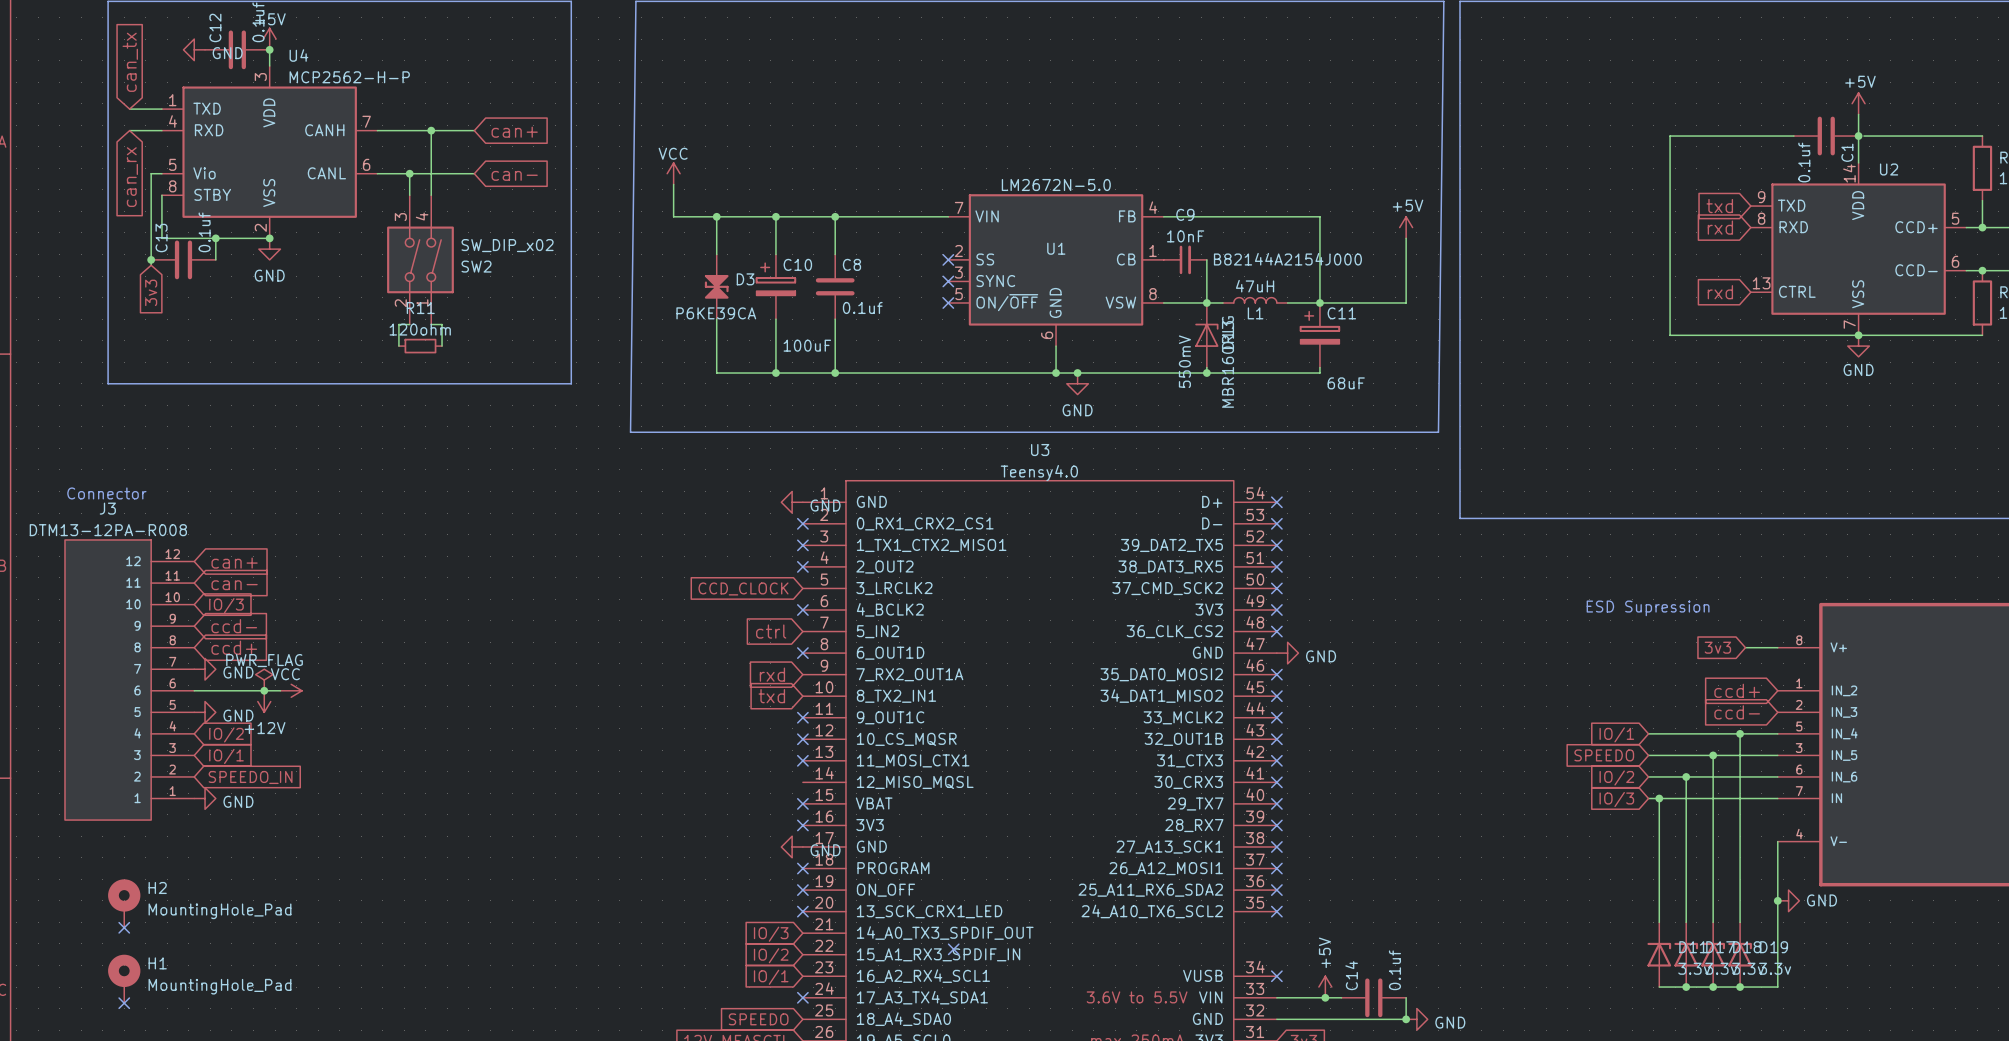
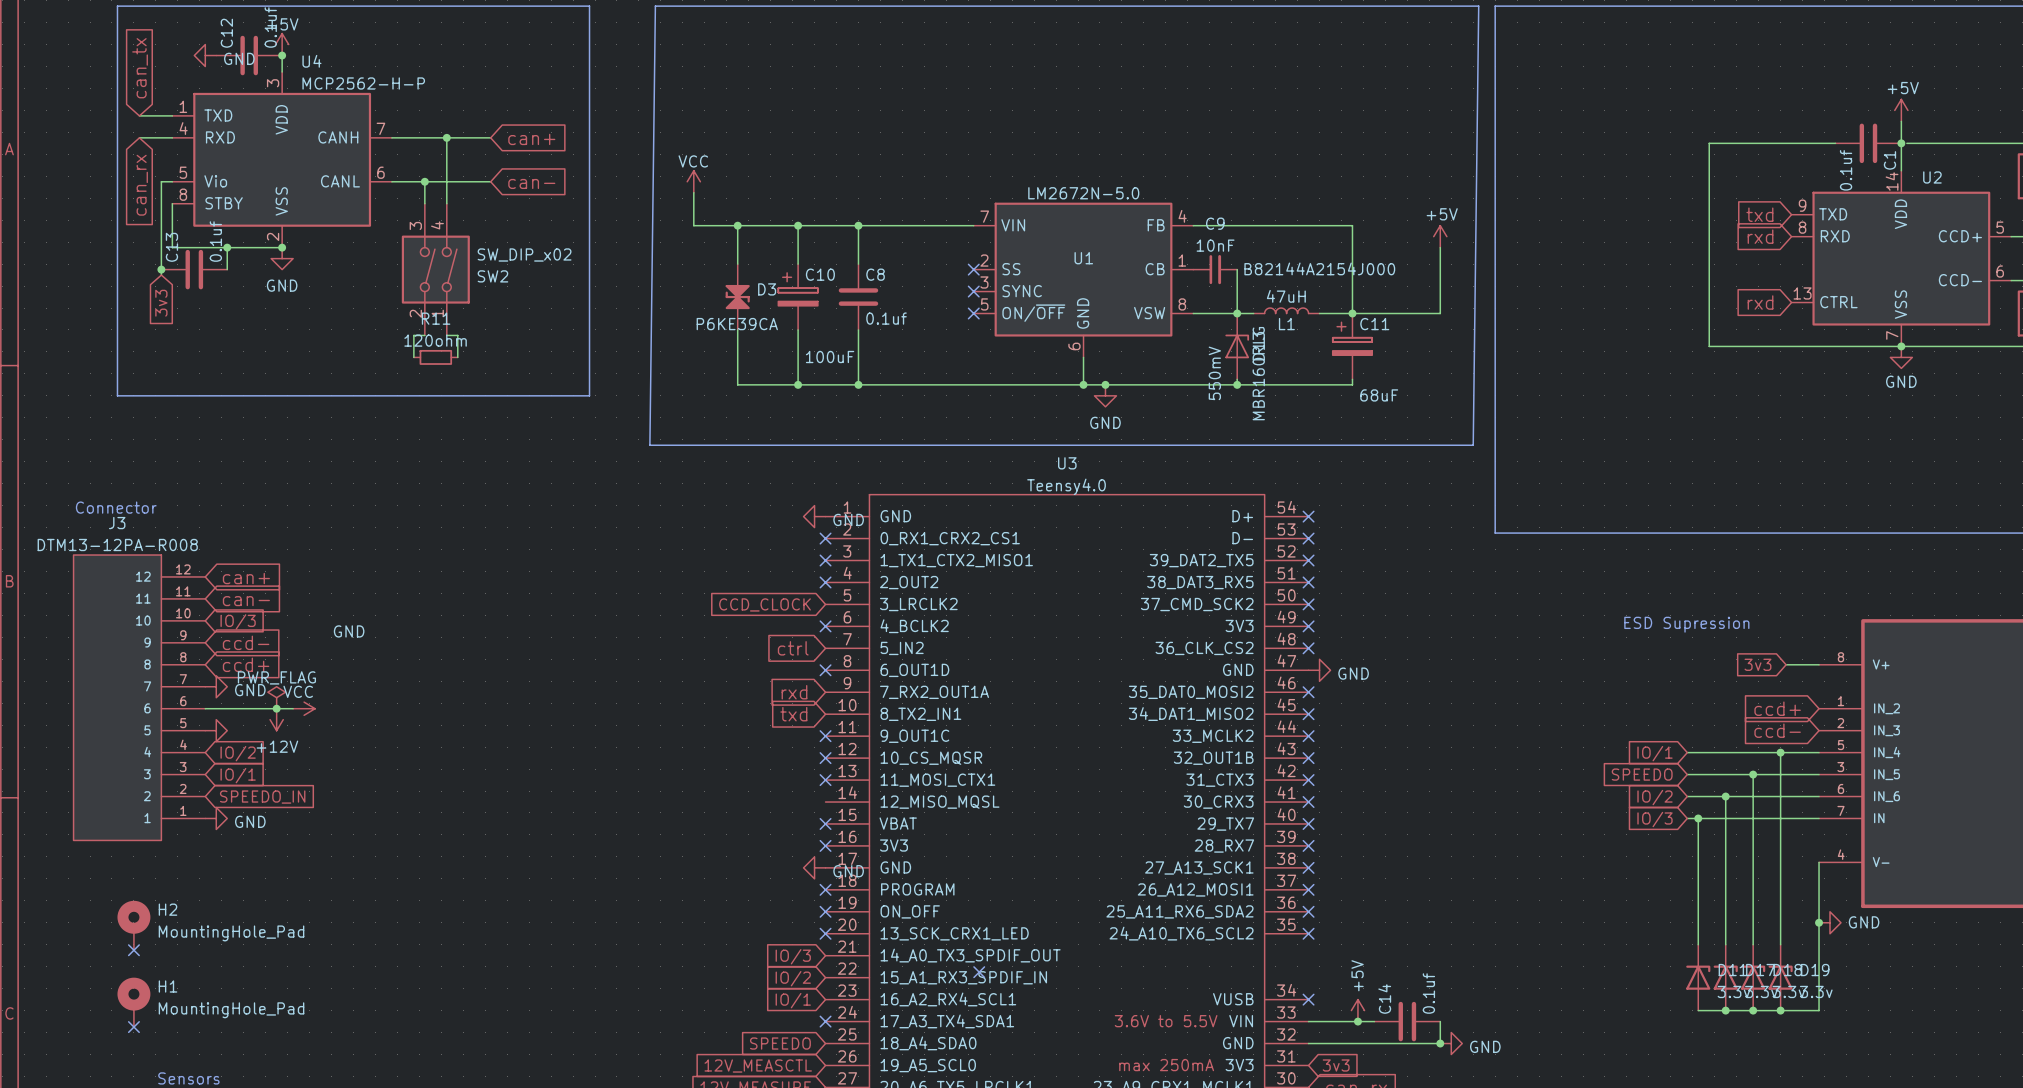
power symbol text position: GND (238, 715) -> GND (349, 631)

